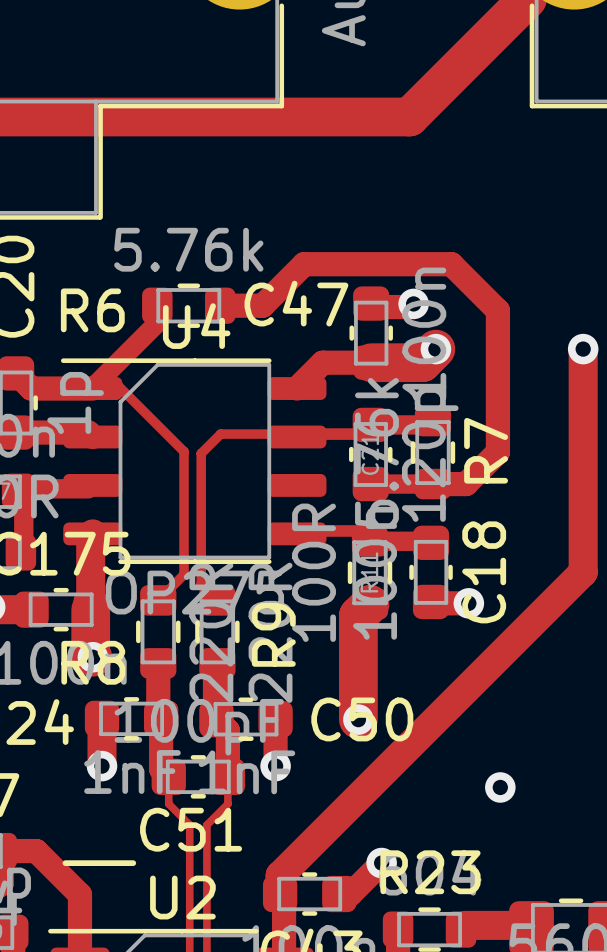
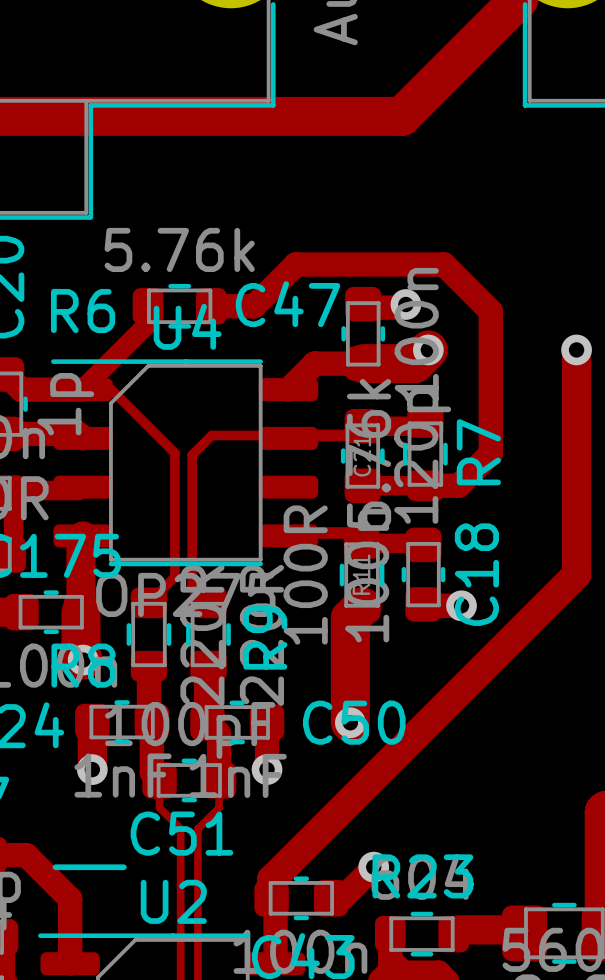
via: (500, 787) -> none

